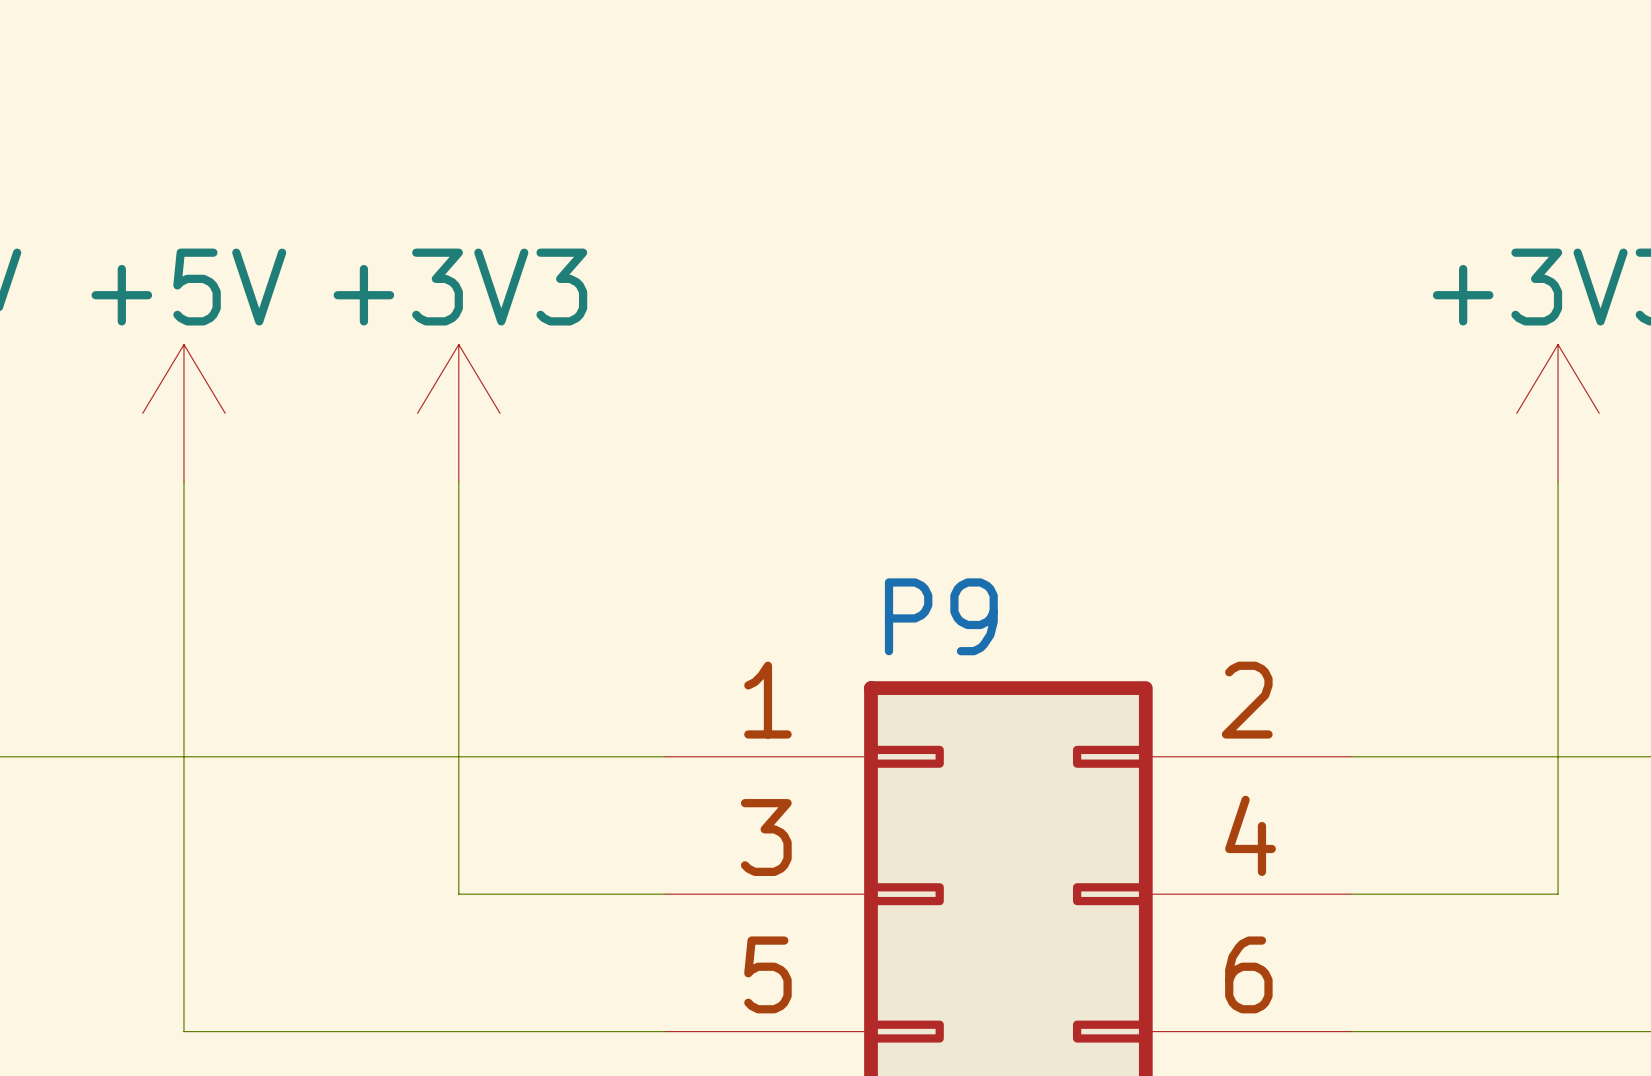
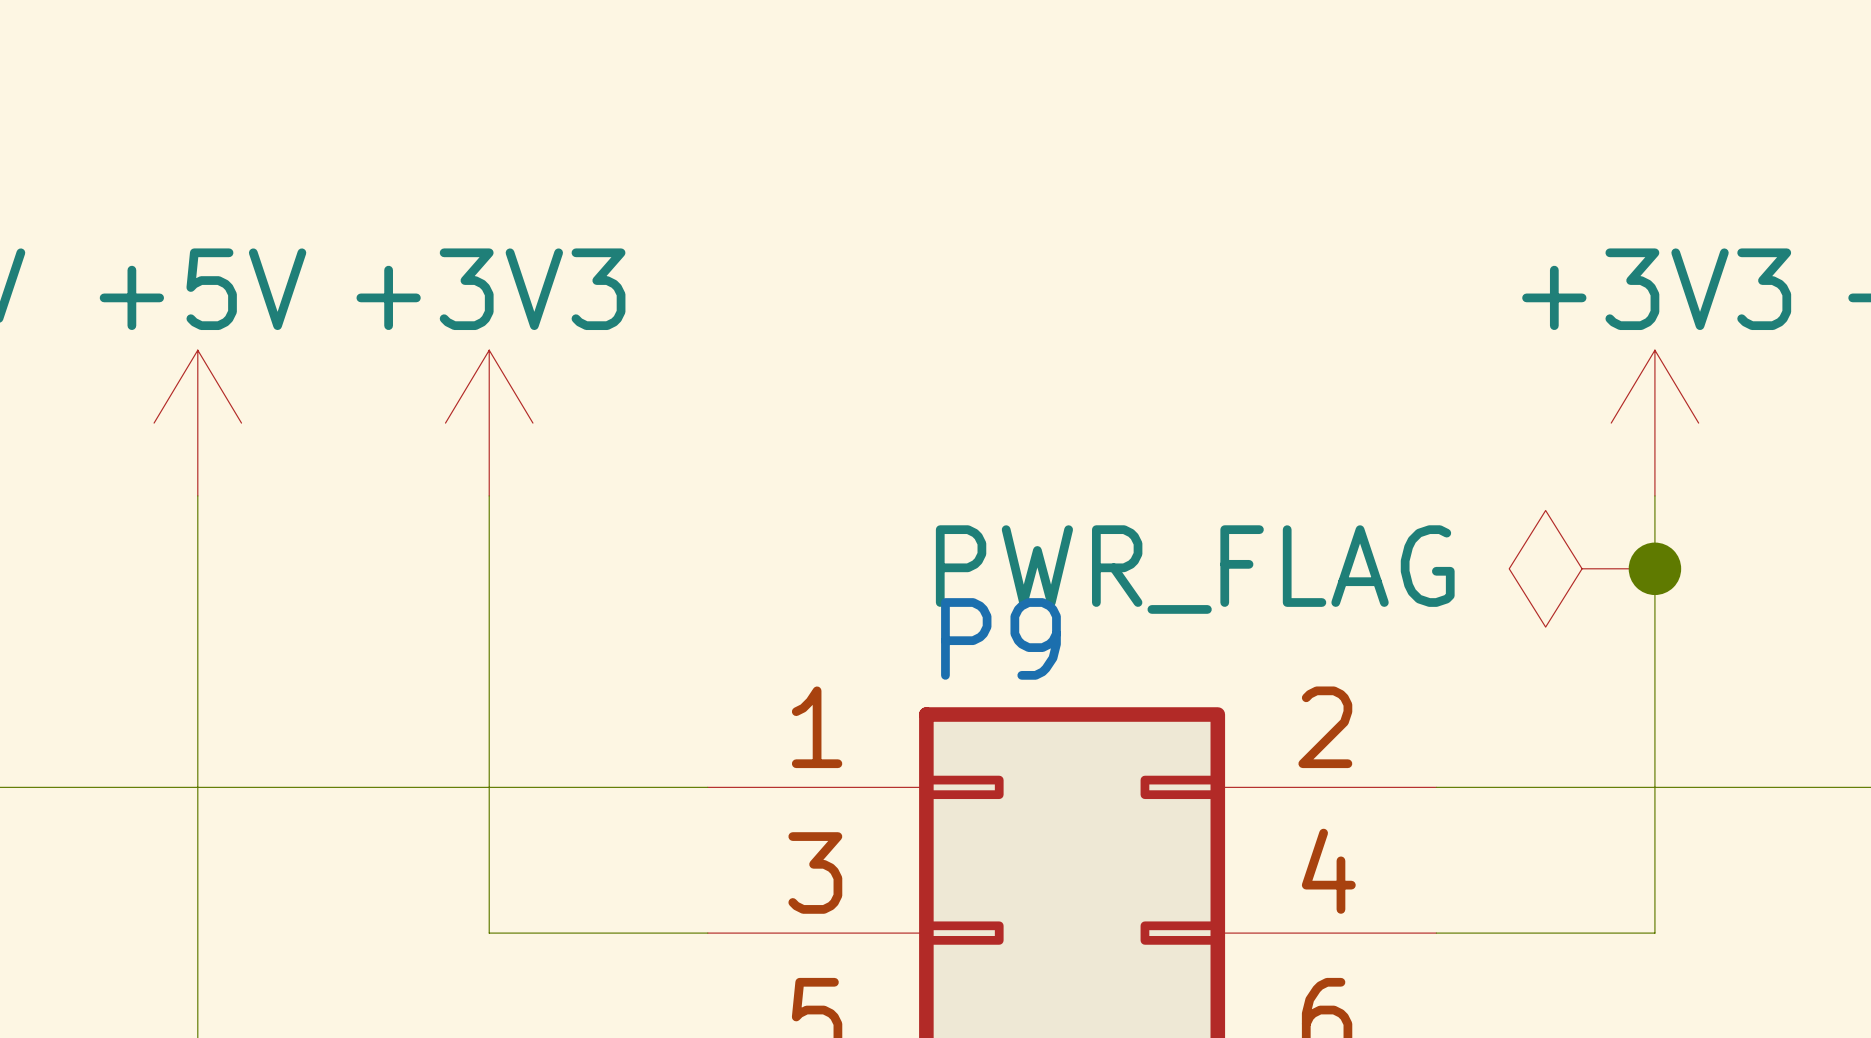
power symbol: none -> PWR_FLAG (1582, 568)
junction: none -> (1654, 568)

